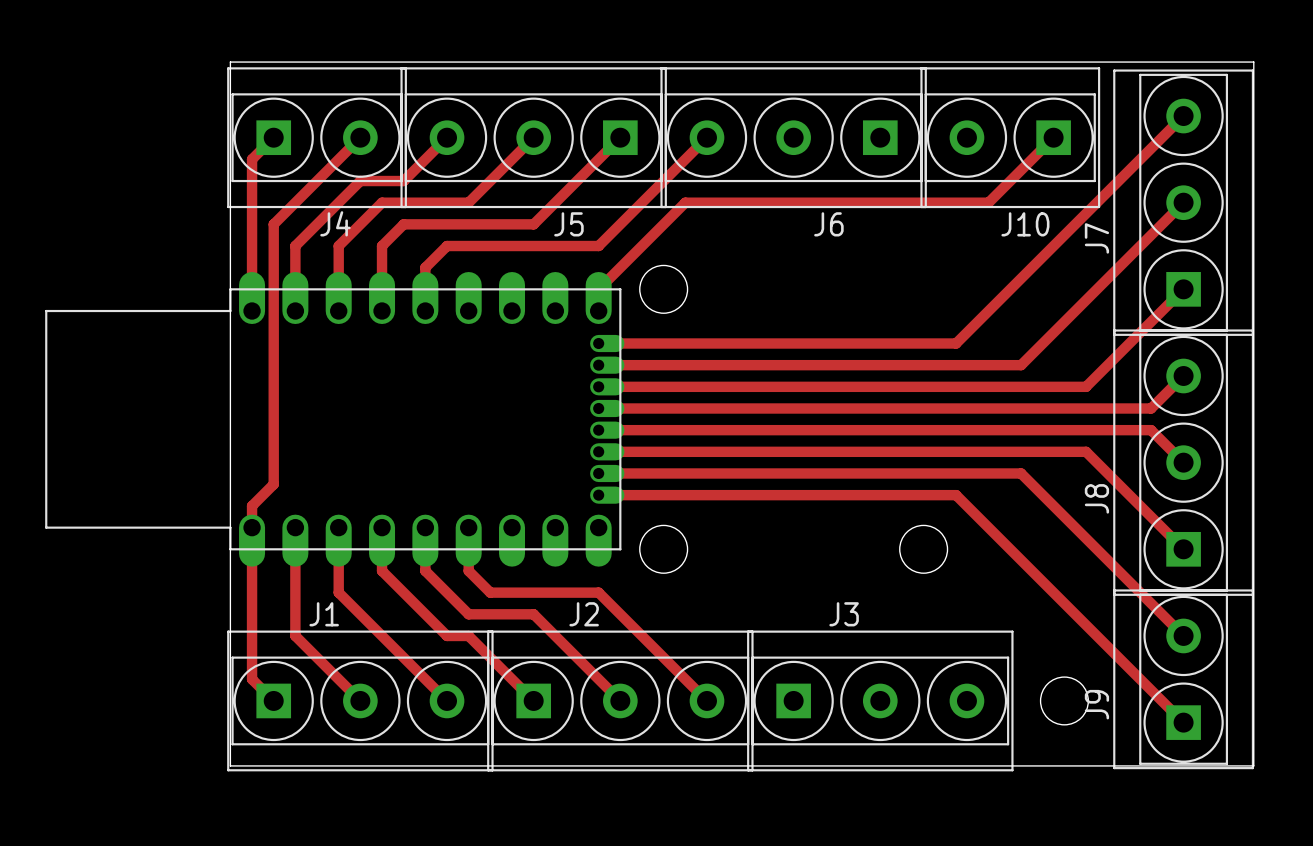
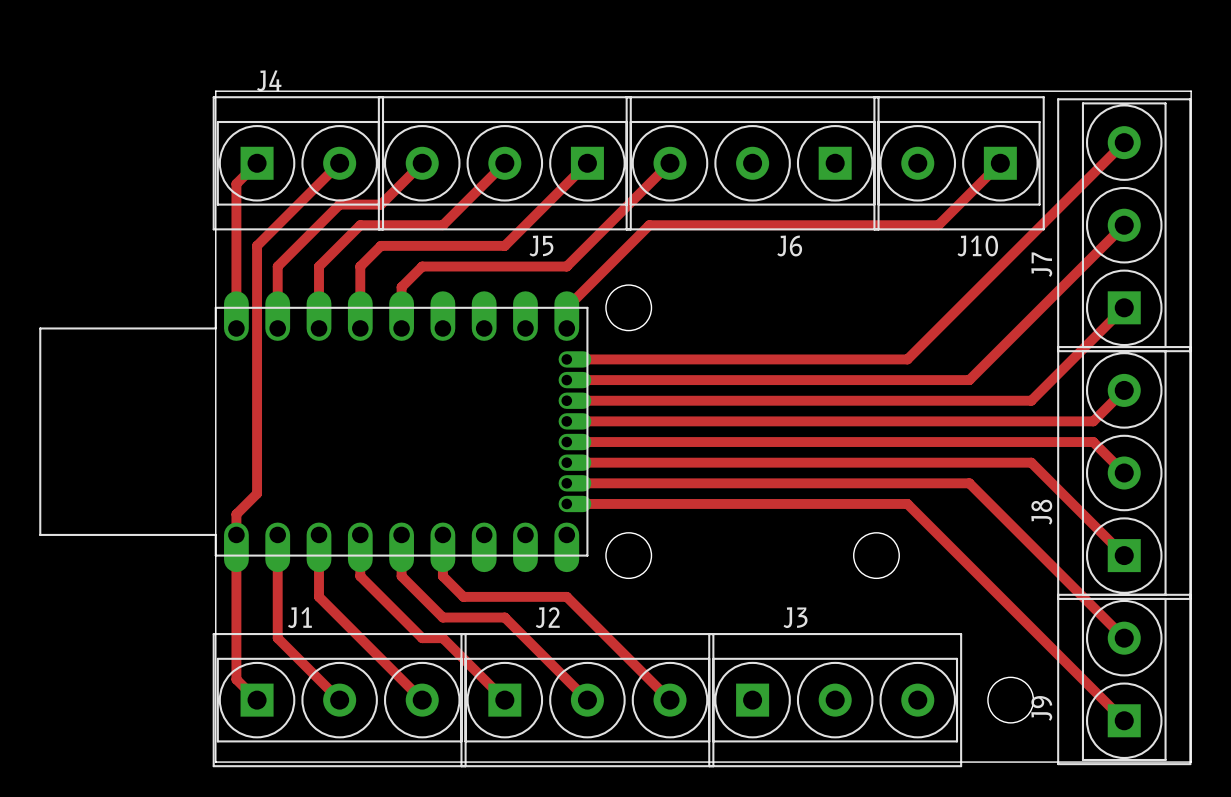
J4 name position: J4 (335, 223) -> J4 (269, 80)

